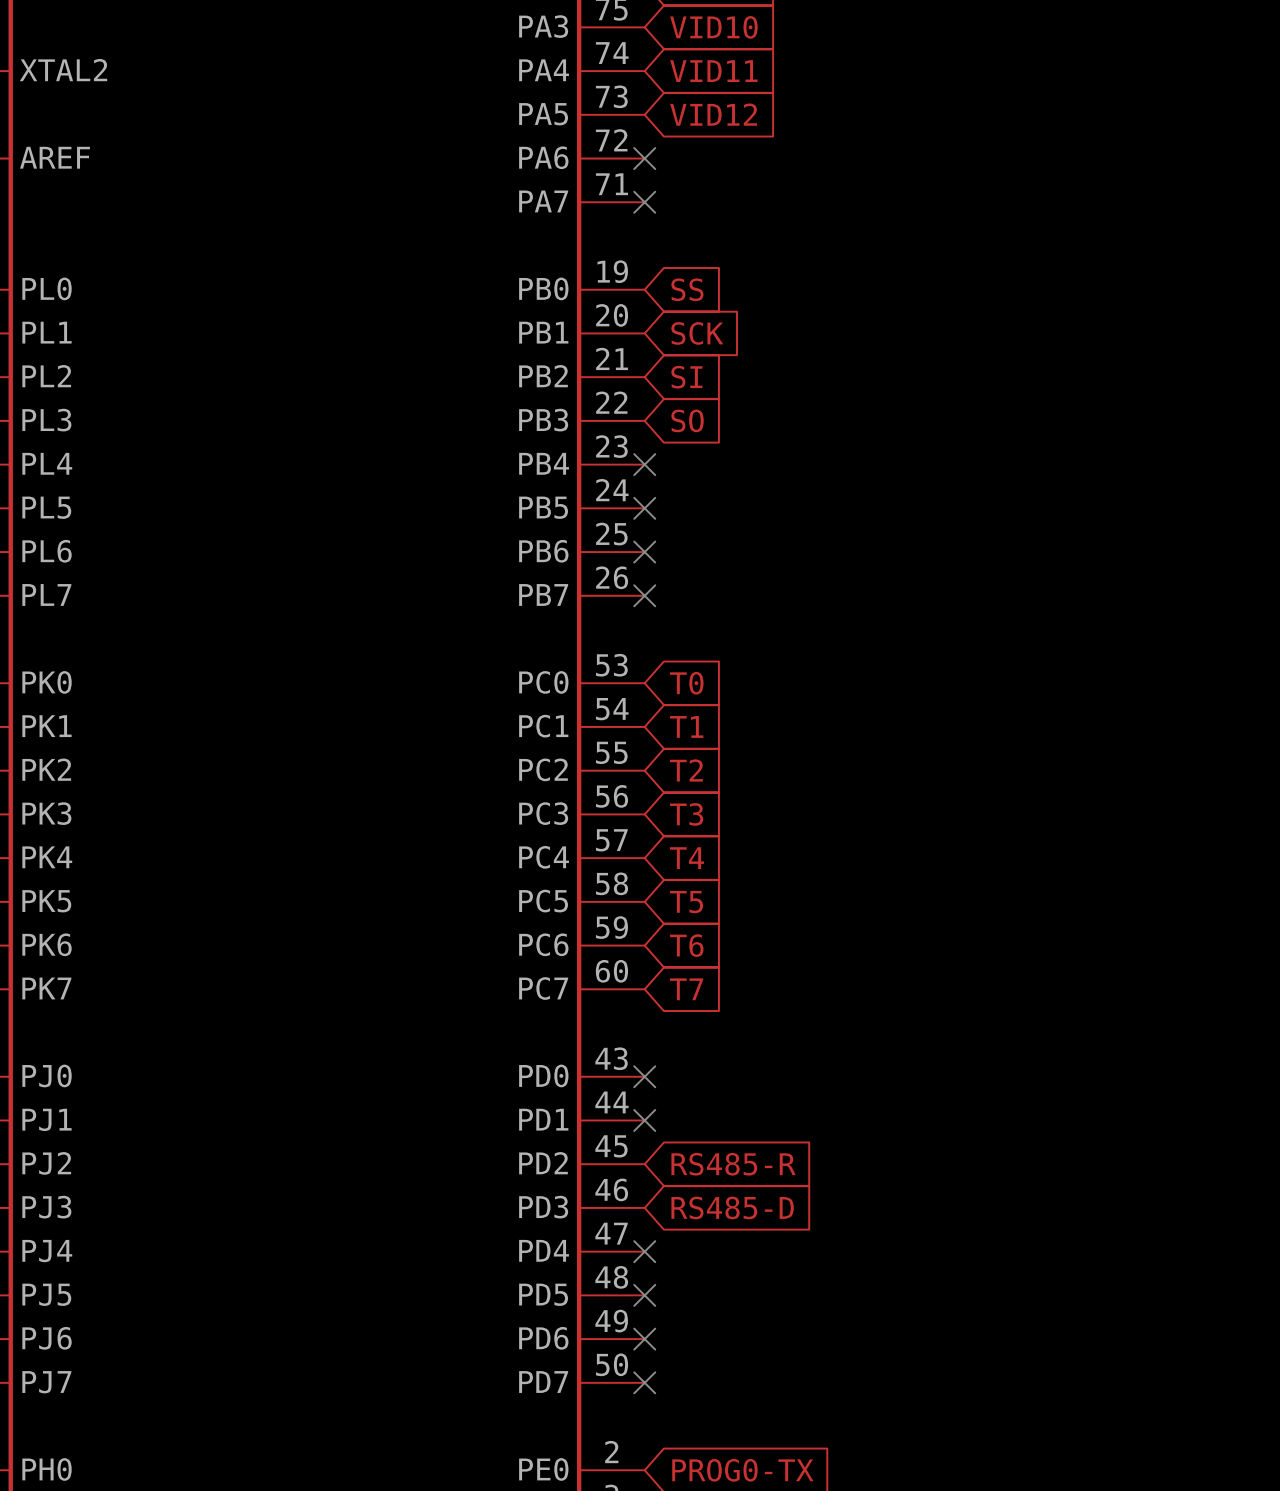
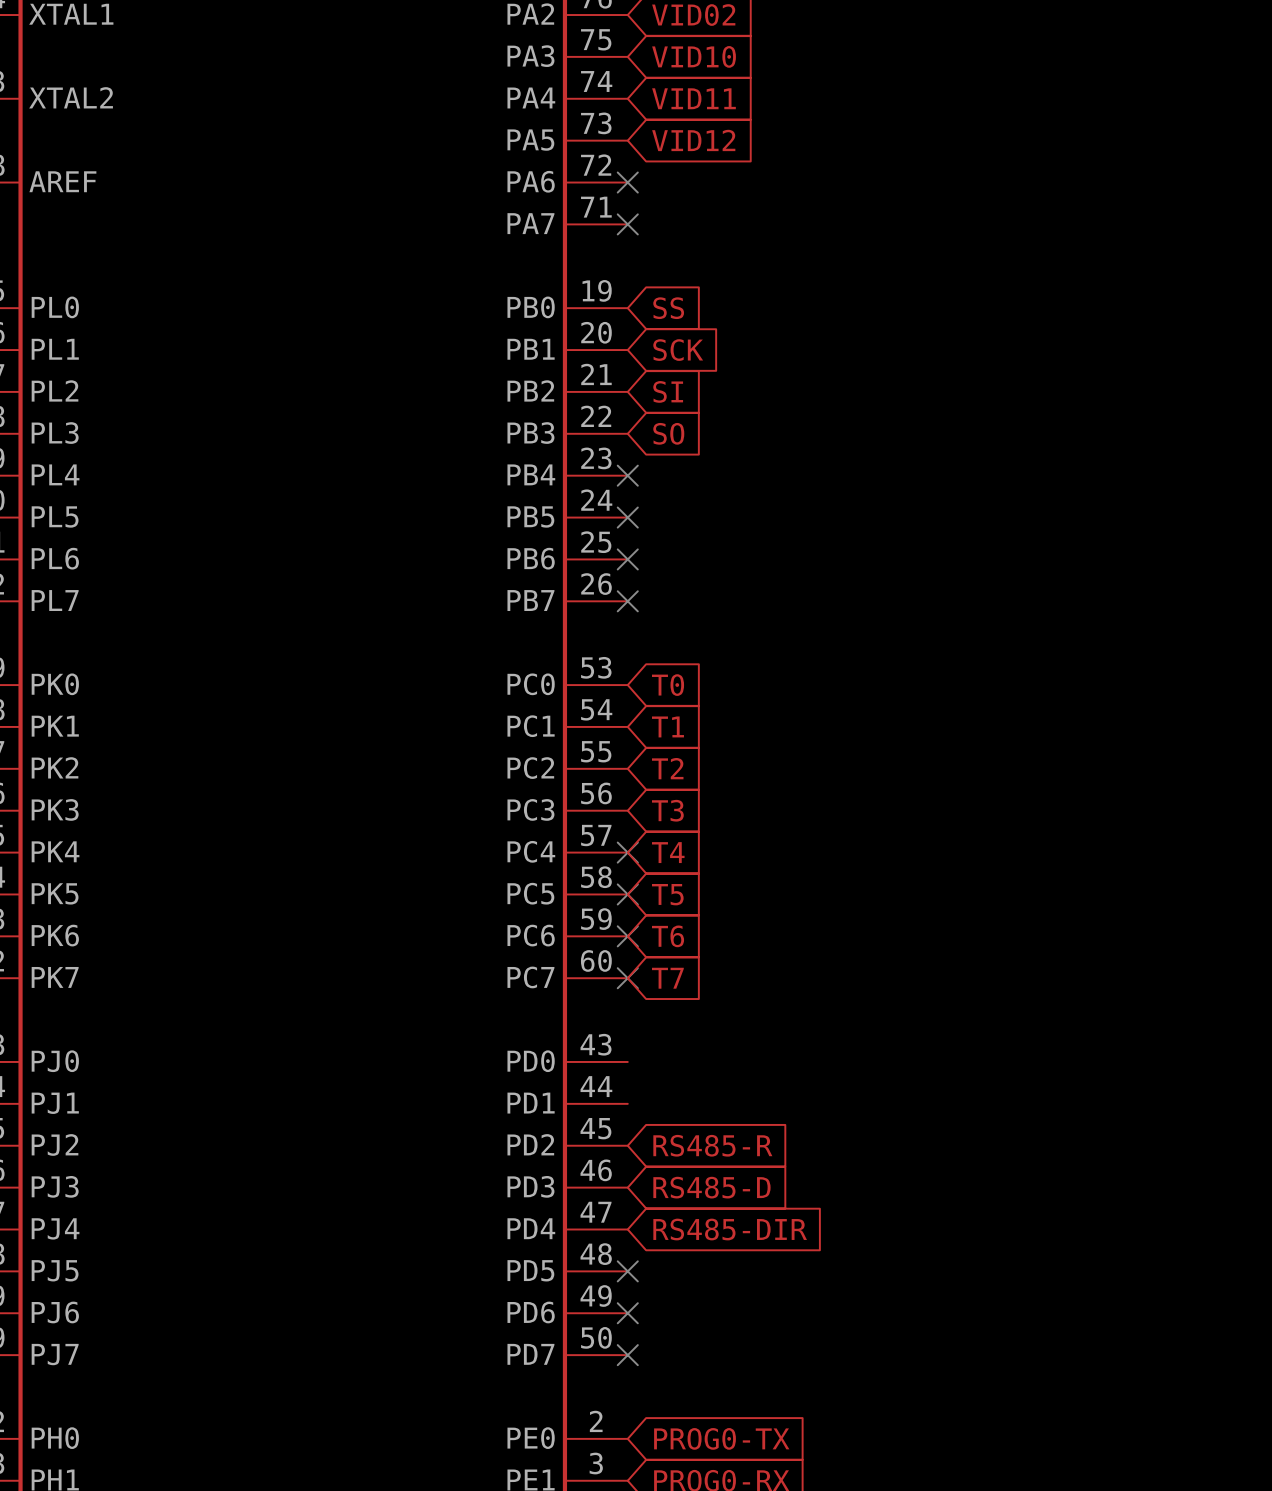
no-connect mark: none -> (627, 852)
no-connect mark: none -> (627, 894)
no-connect mark: none -> (627, 936)
no-connect mark: none -> (627, 978)
no-connect mark: (644, 1076) -> none
no-connect mark: (644, 1120) -> none
no-connect mark: (644, 1251) -> none
global label: none -> RS485-DIR (730, 1229)

